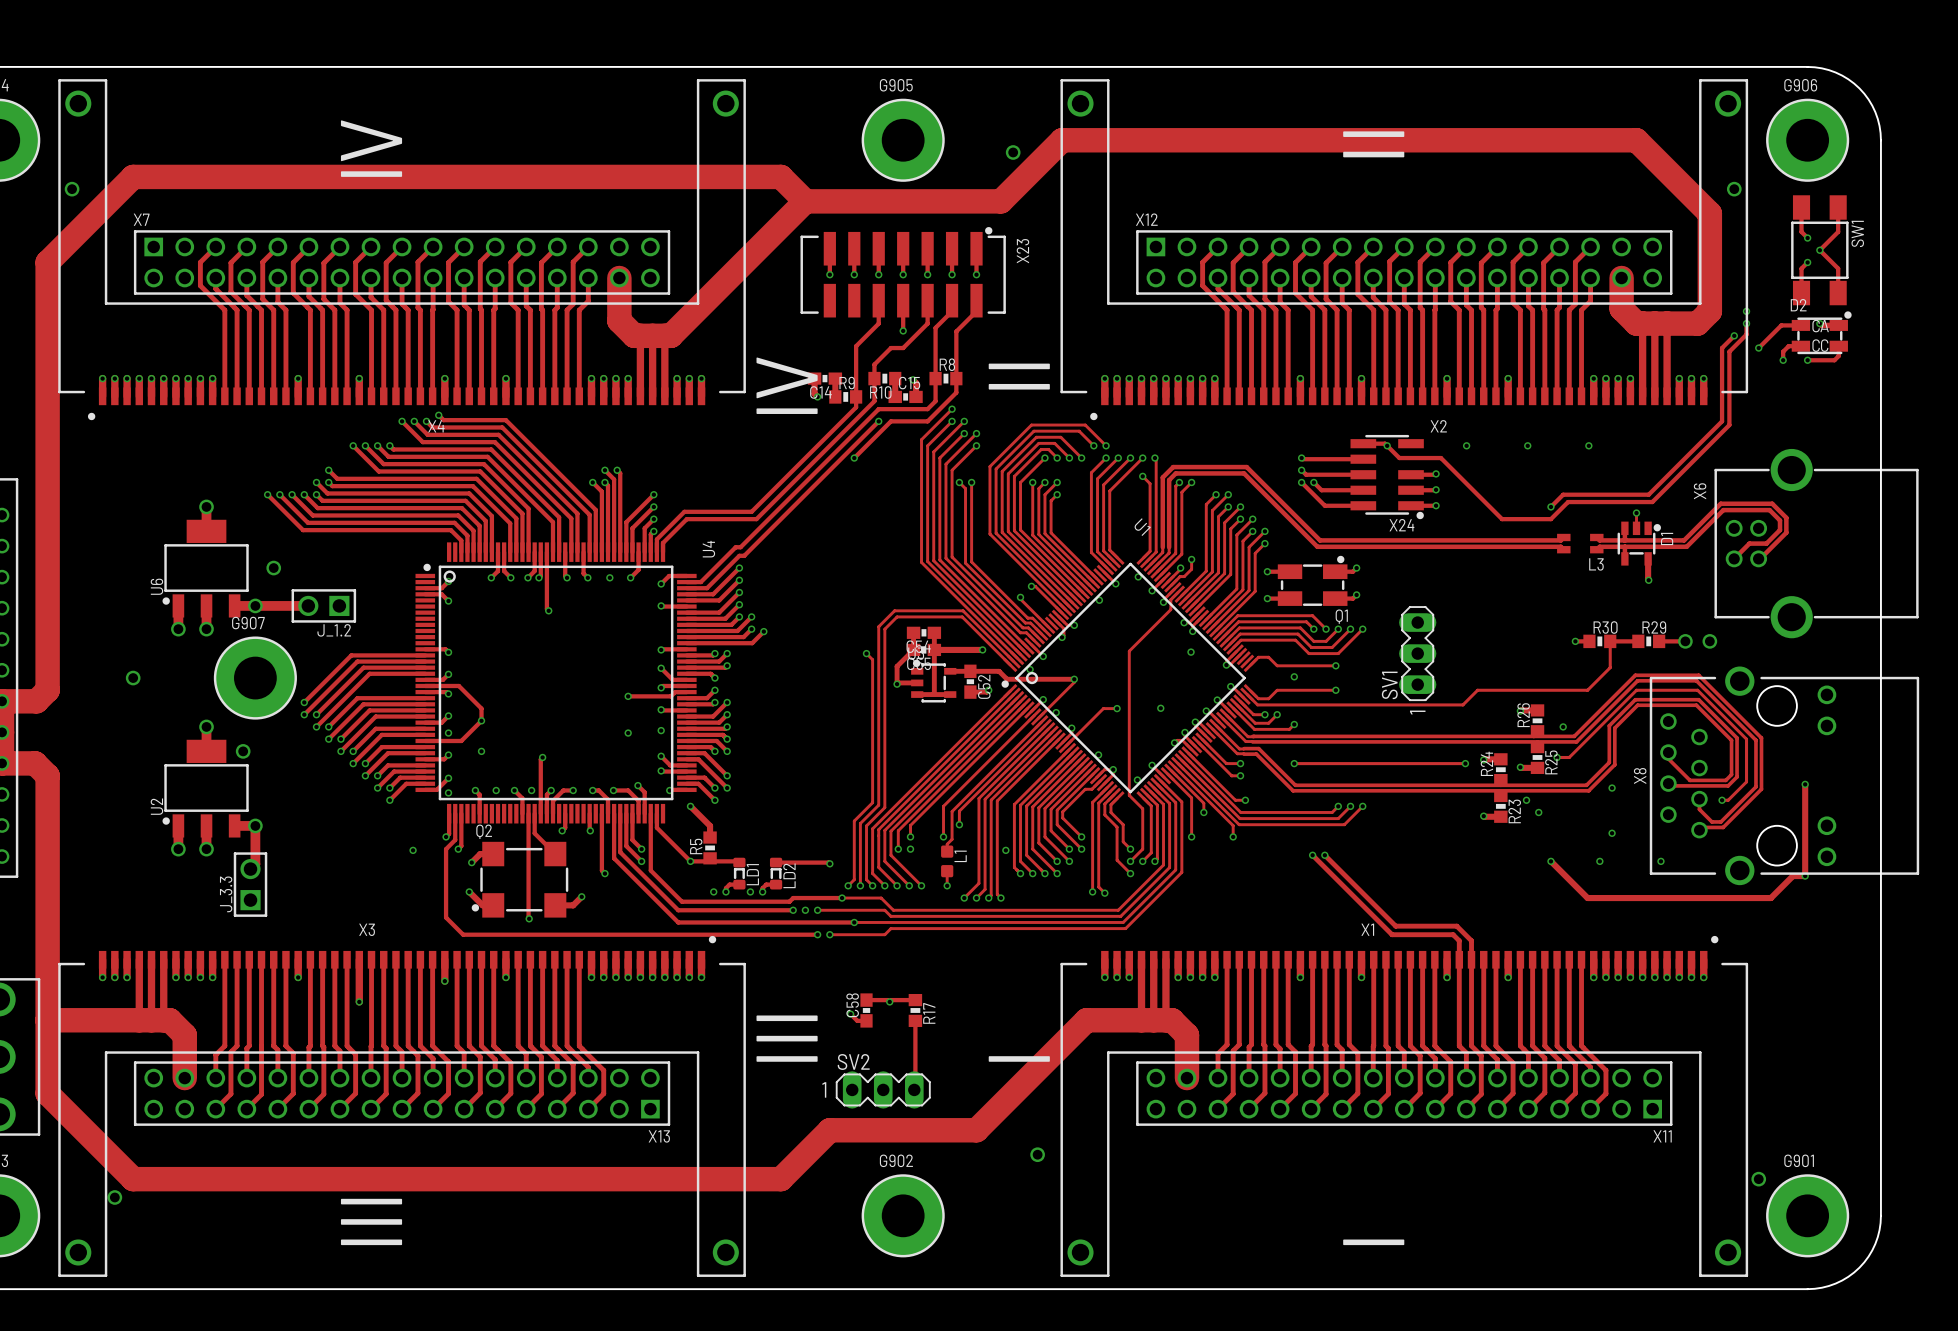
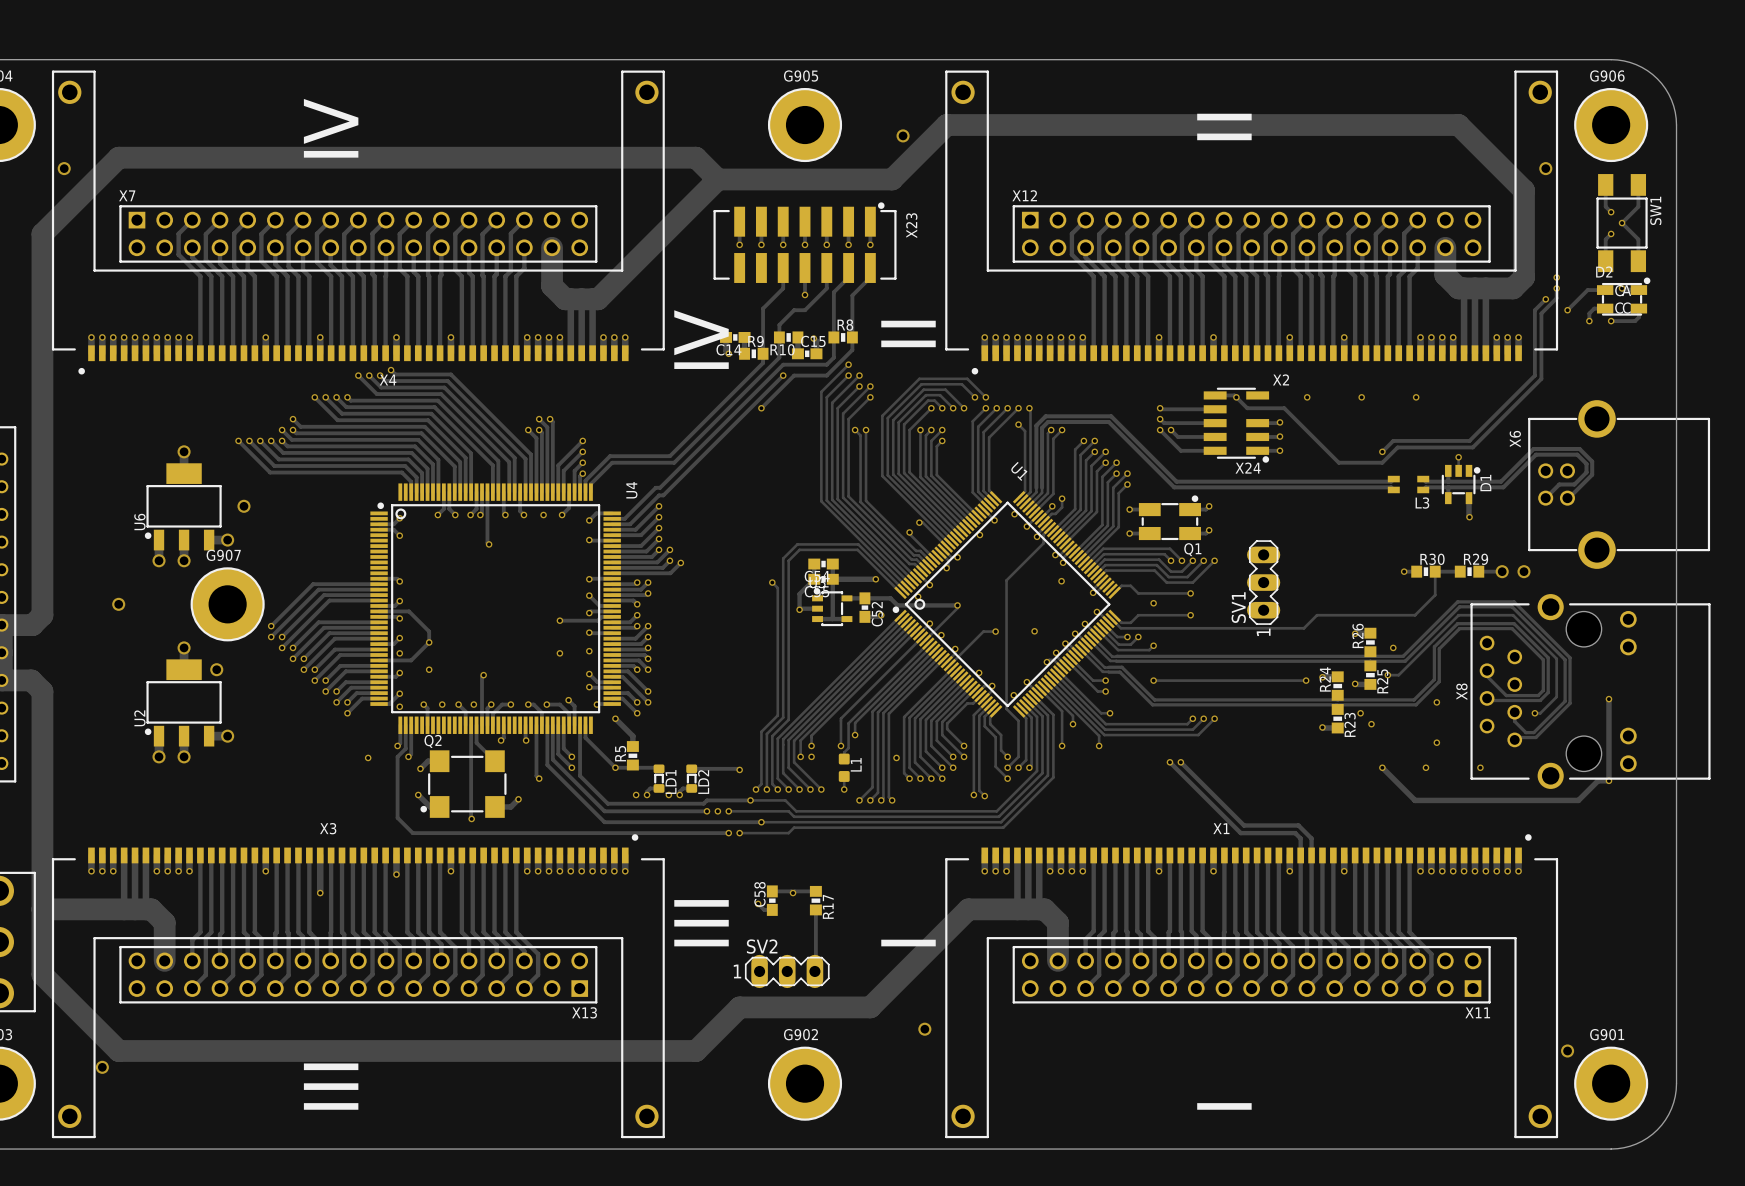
track: (255, 605) (308, 605) -> none
J_1.2: (323, 605) -> none
track: (255, 825) (255, 864) (250, 869) -> none
J_3.3: (250, 884) -> none

